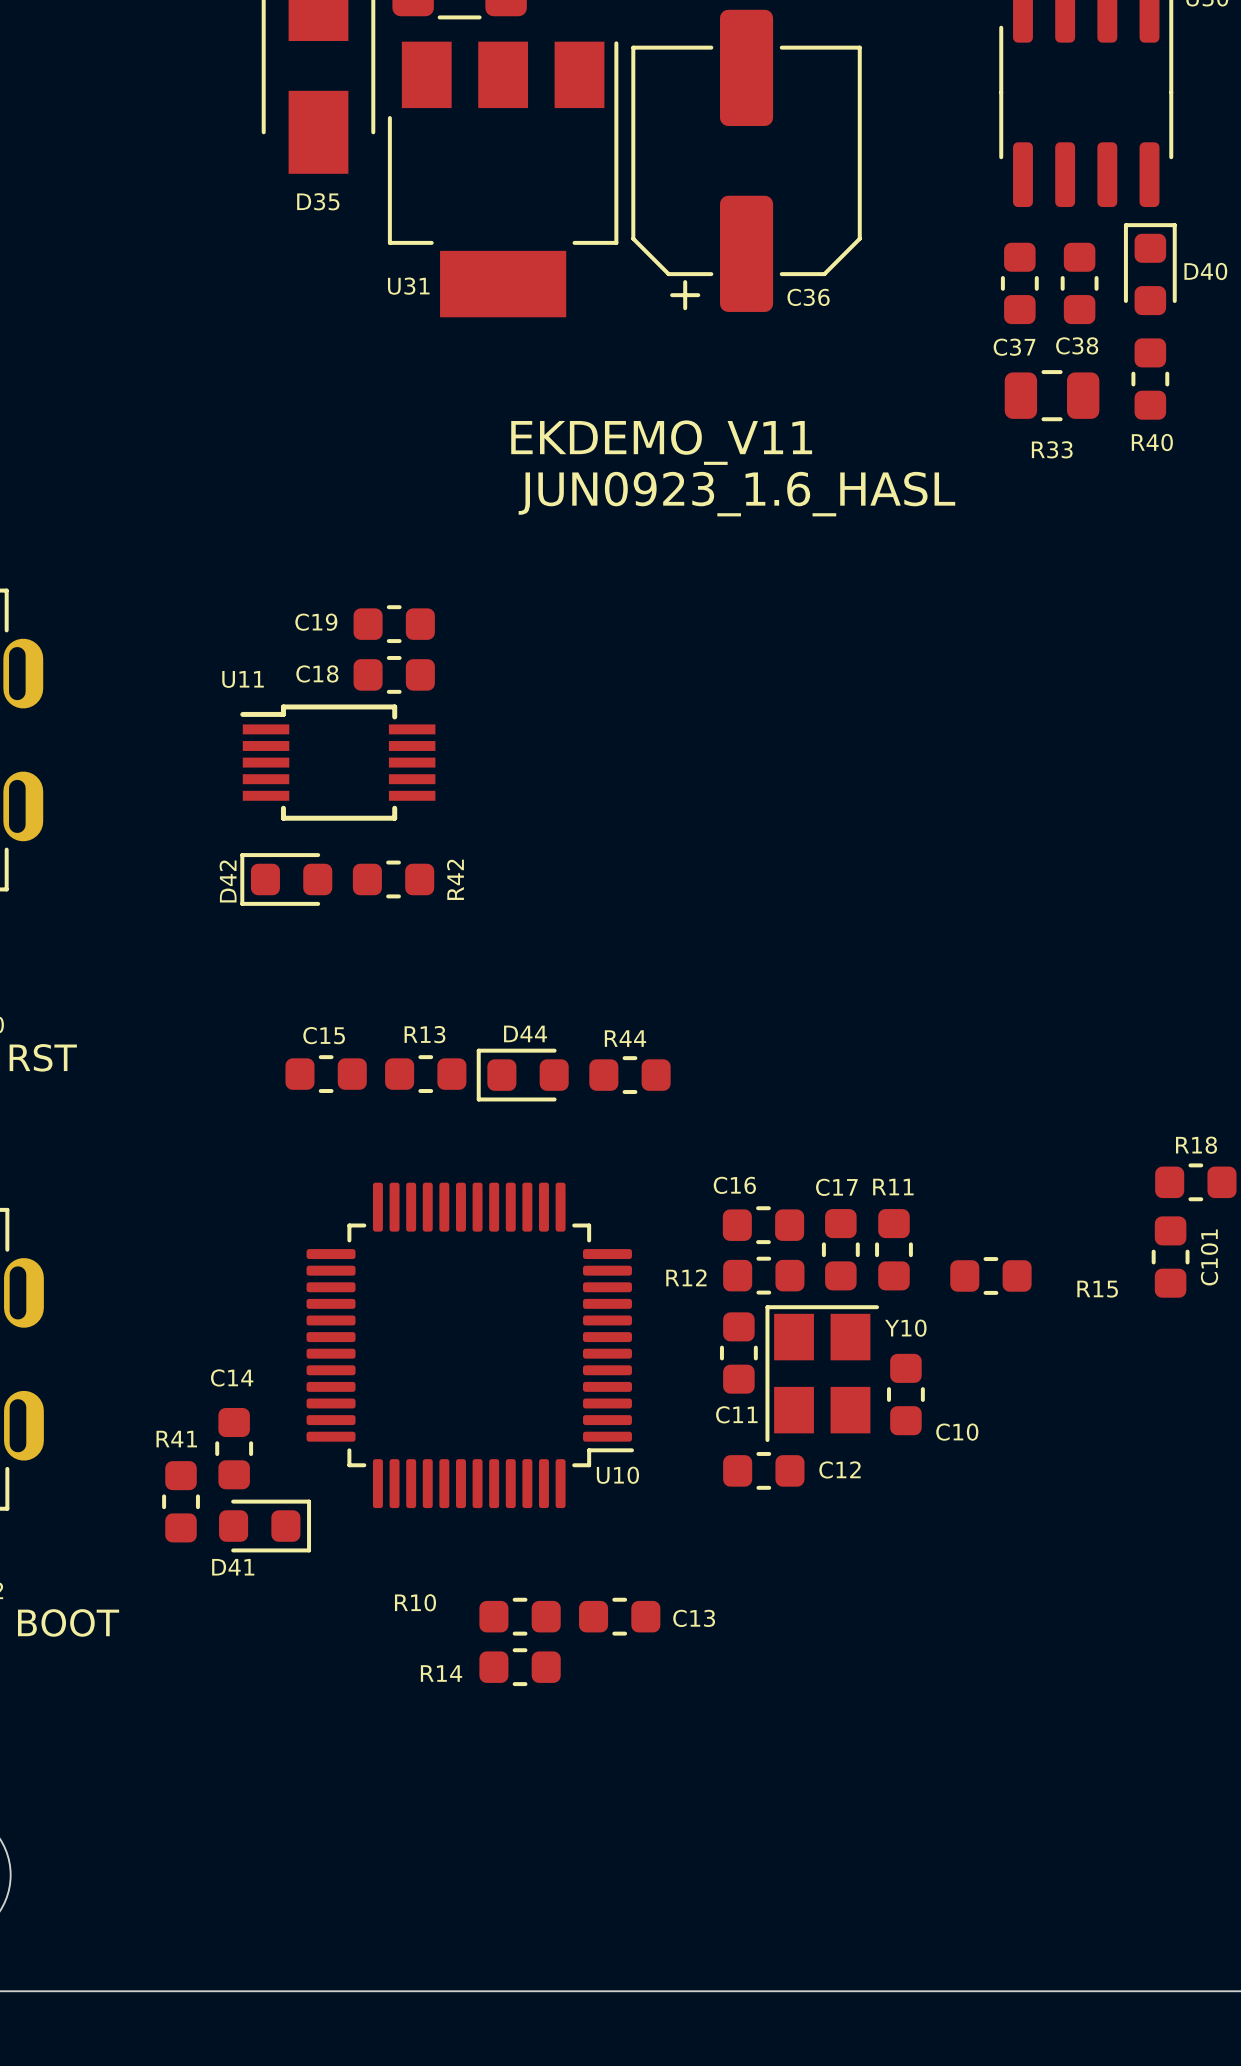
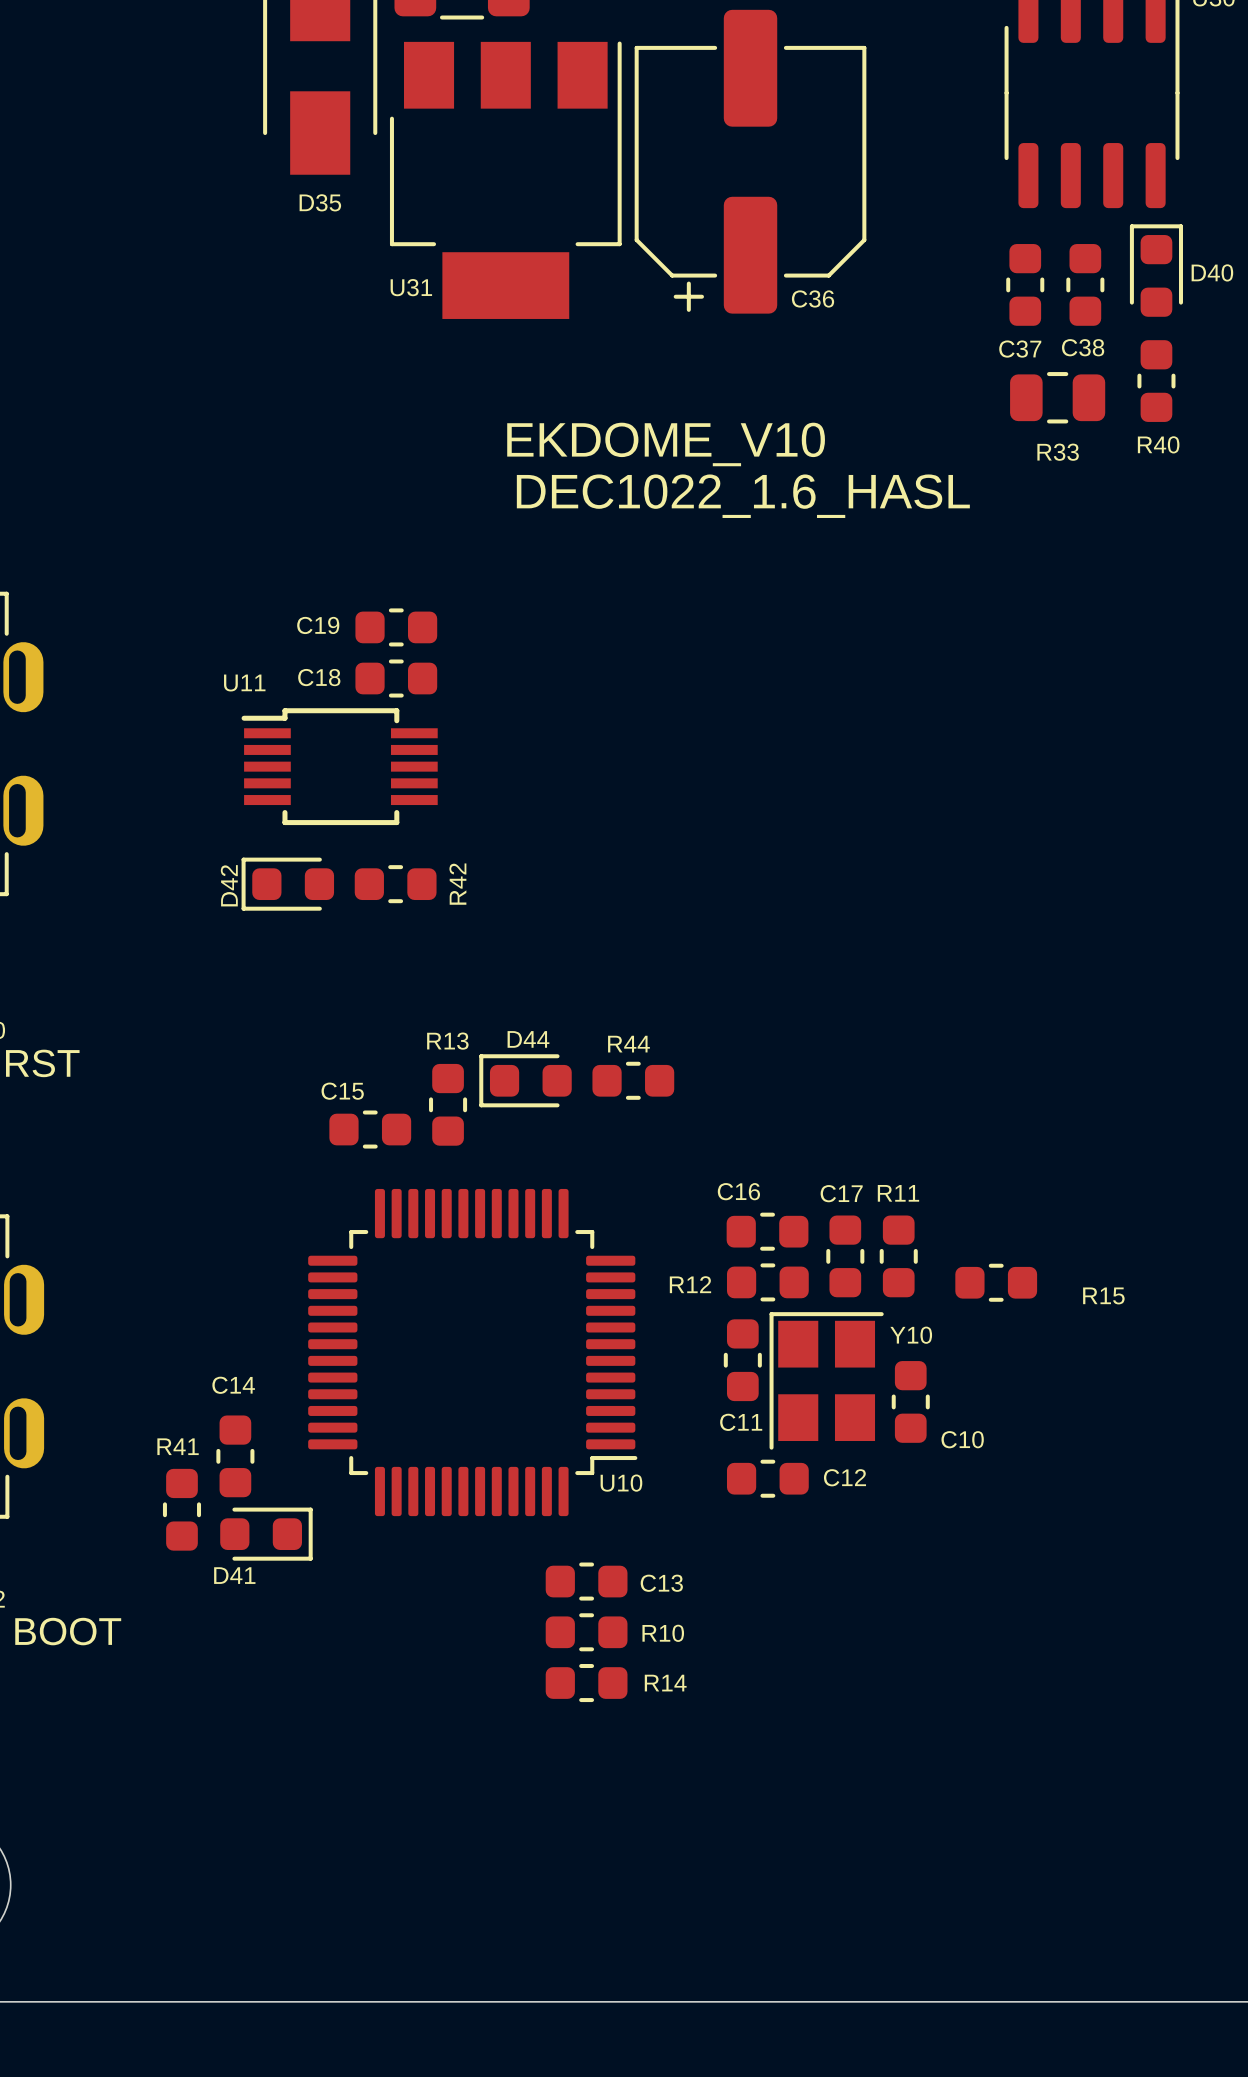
text: EKDEMO_V11 (661, 442) -> EKDOME_V10 (666, 444)
text: JUN0923_1.6_HASL (736, 494) -> DEC1022_1.6_HASL (743, 496)
C15 name position: C15 (324, 1035) -> C15 (342, 1091)
C15 position: (326, 1074) -> (370, 1129)
R13 rotation: 0° (425, 1074) -> 90° clockwise (448, 1104)
R18: (1195, 1182) -> none
C101: (1170, 1257) -> none
R10 name position: R10 (415, 1602) -> R10 (663, 1633)
R10 position: (520, 1616) -> (586, 1632)
C13 position: (619, 1616) -> (586, 1581)
R14 position: (520, 1667) -> (586, 1683)
R14 name position: R14 (441, 1673) -> R14 (665, 1683)

